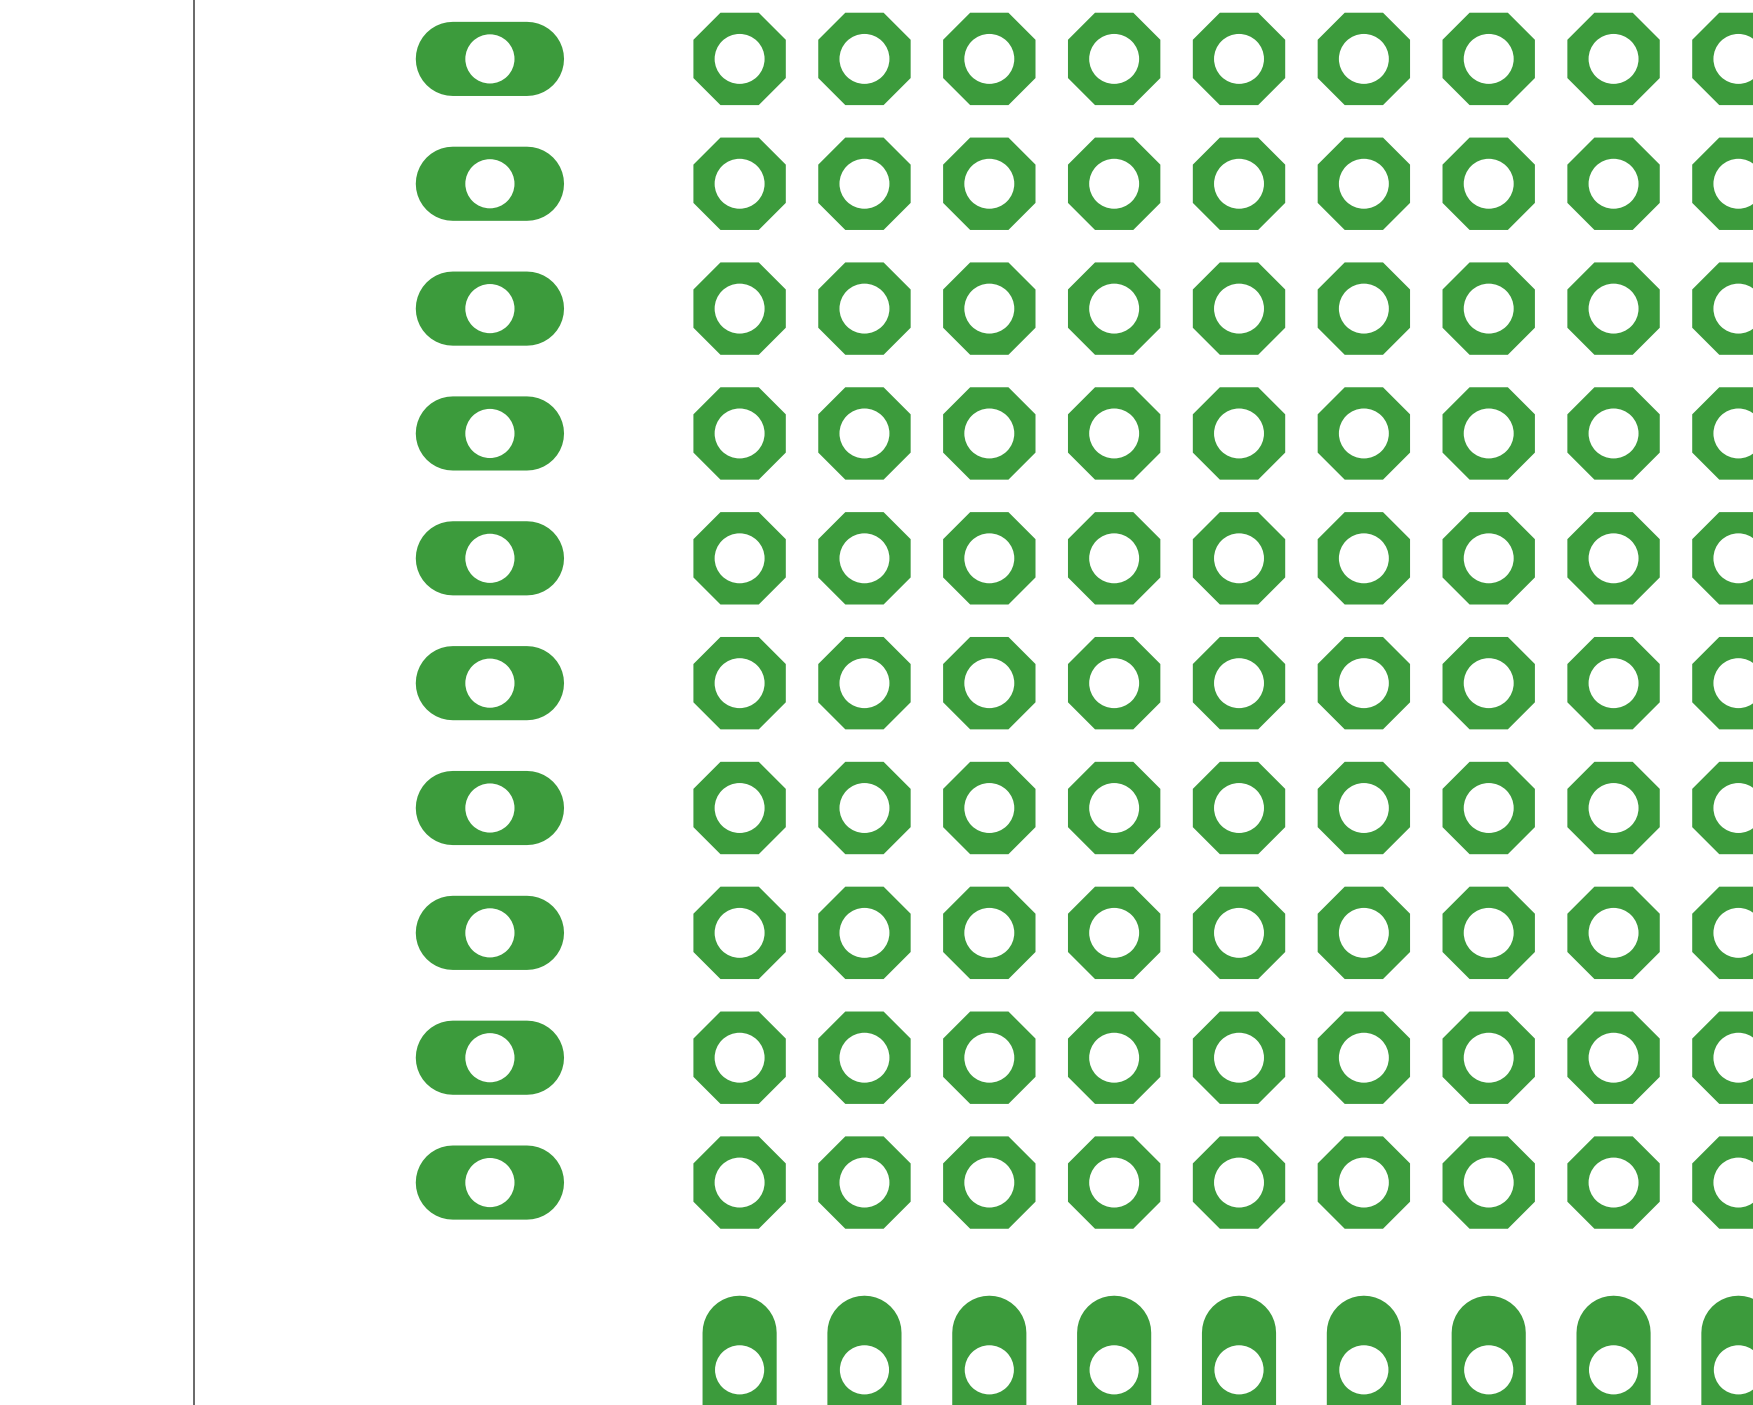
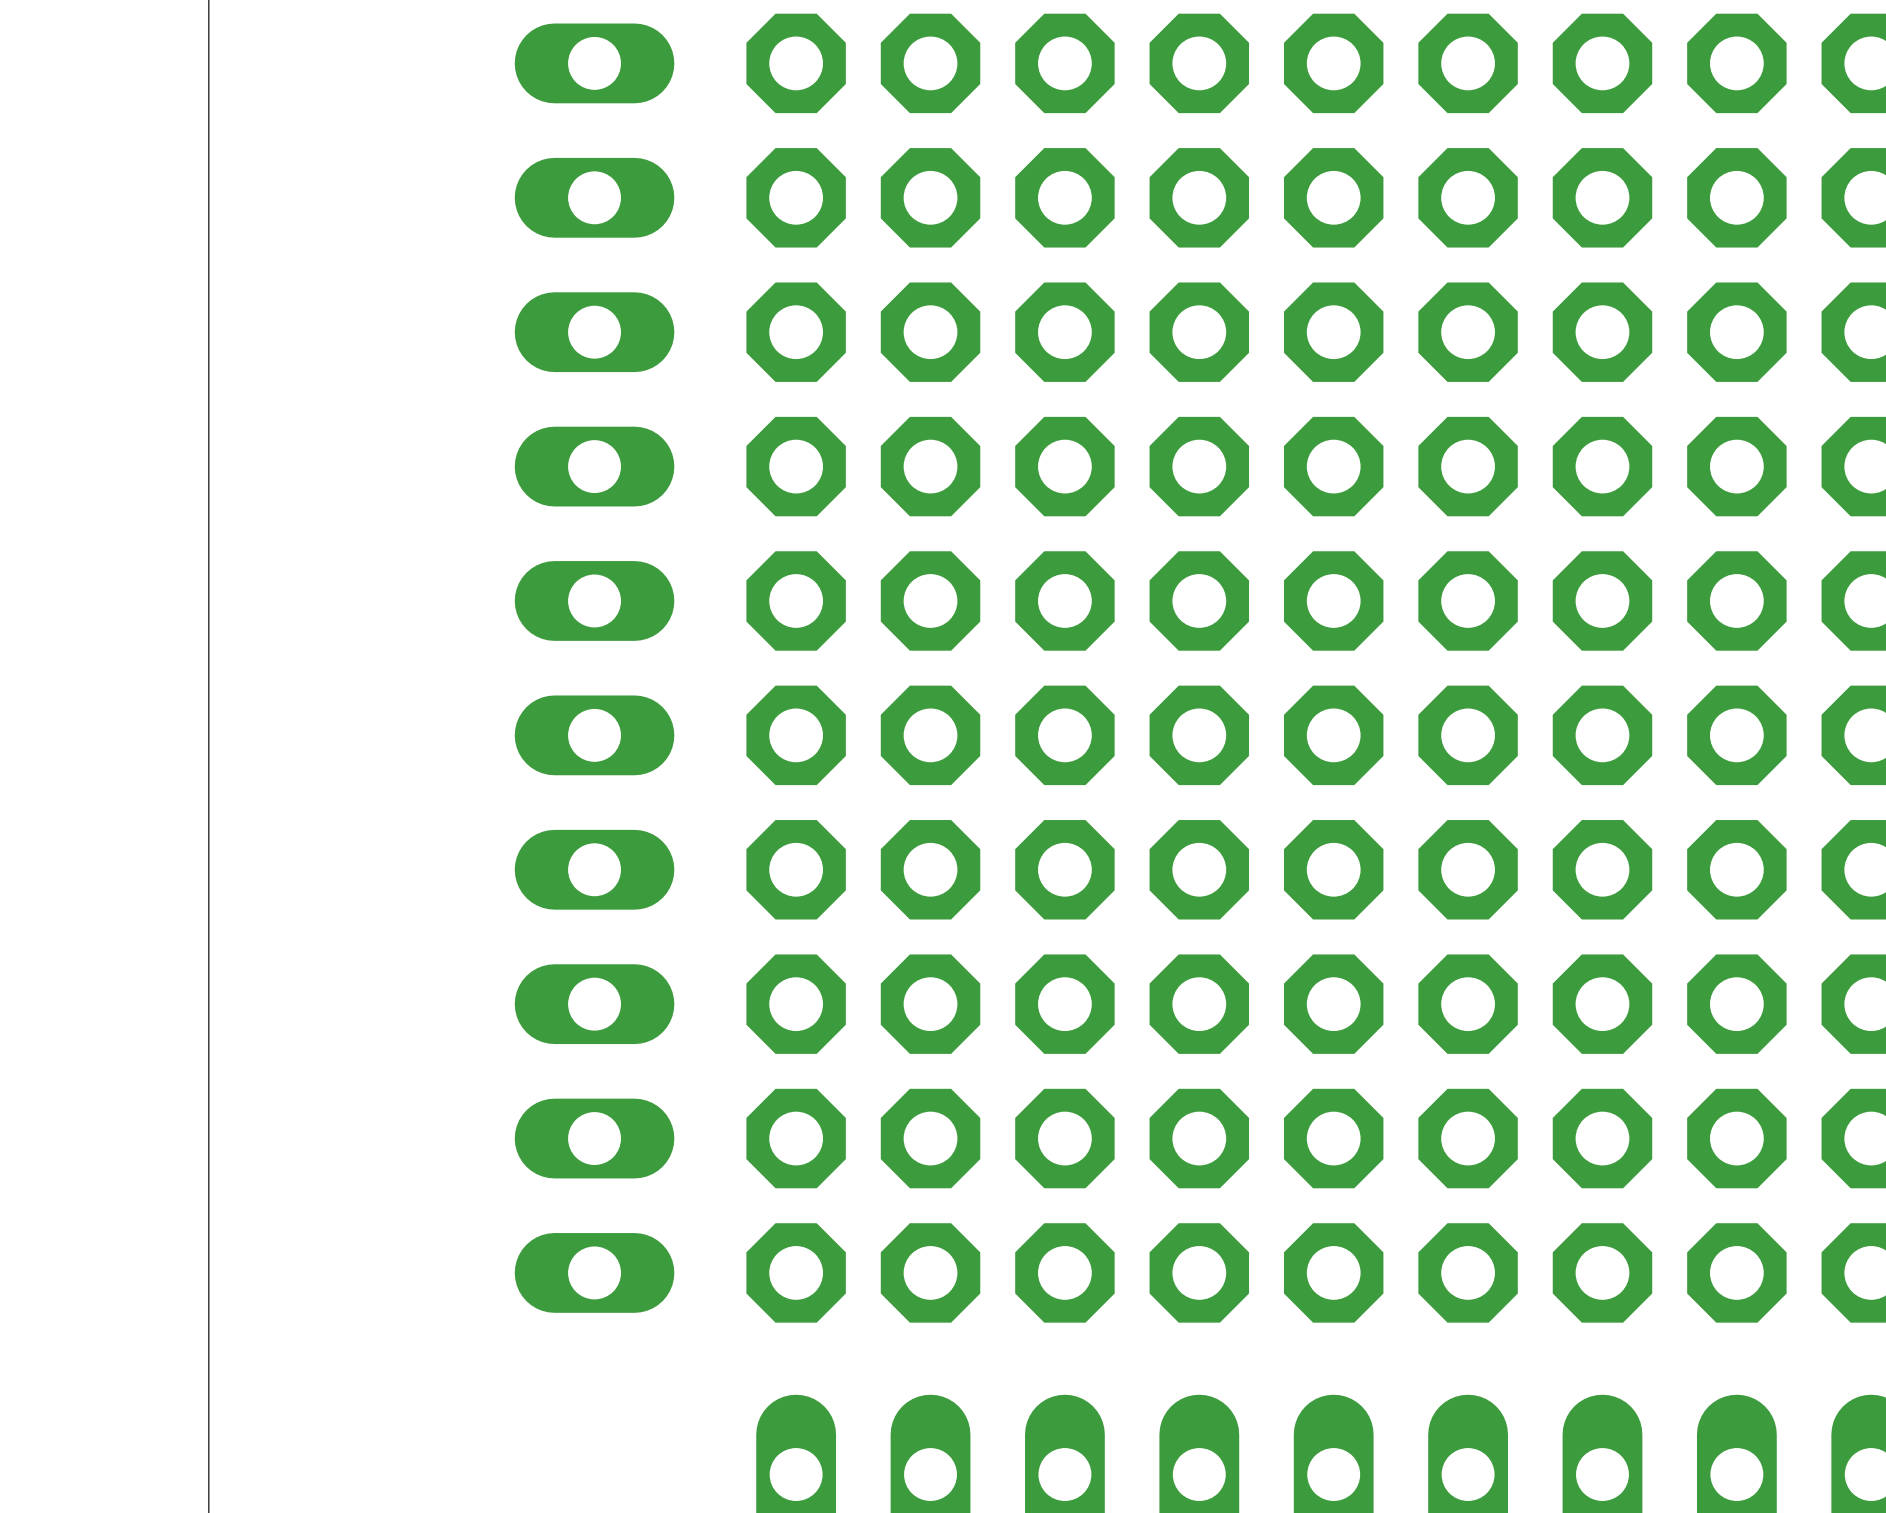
part position: (489, 620) -> (594, 668)

